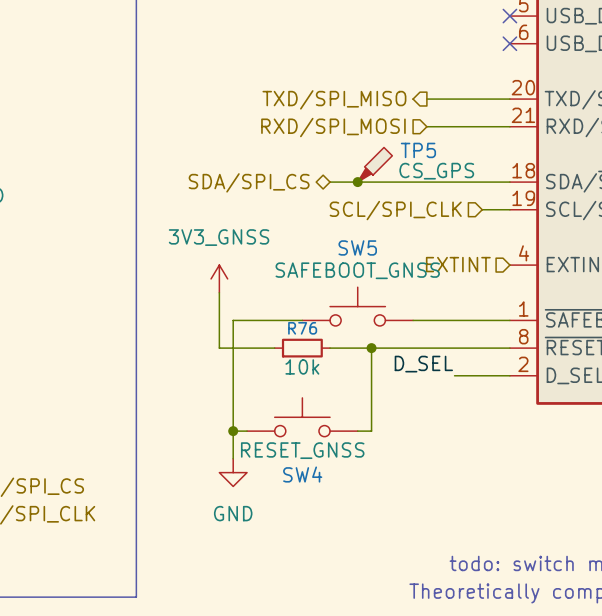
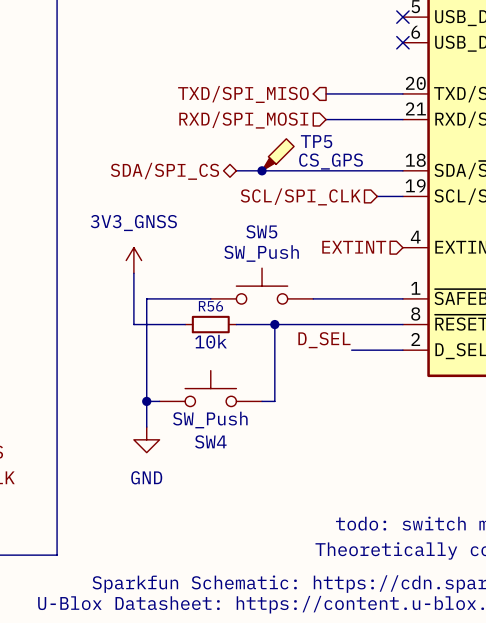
SW5 value: SAFEBOOT_GNSS (357, 270) -> SW_Push (261, 253)
R76 name: R76 (302, 328) -> R56 (210, 306)
SW4 value: RESET_GNSS (302, 450) -> SW_Push (210, 420)

